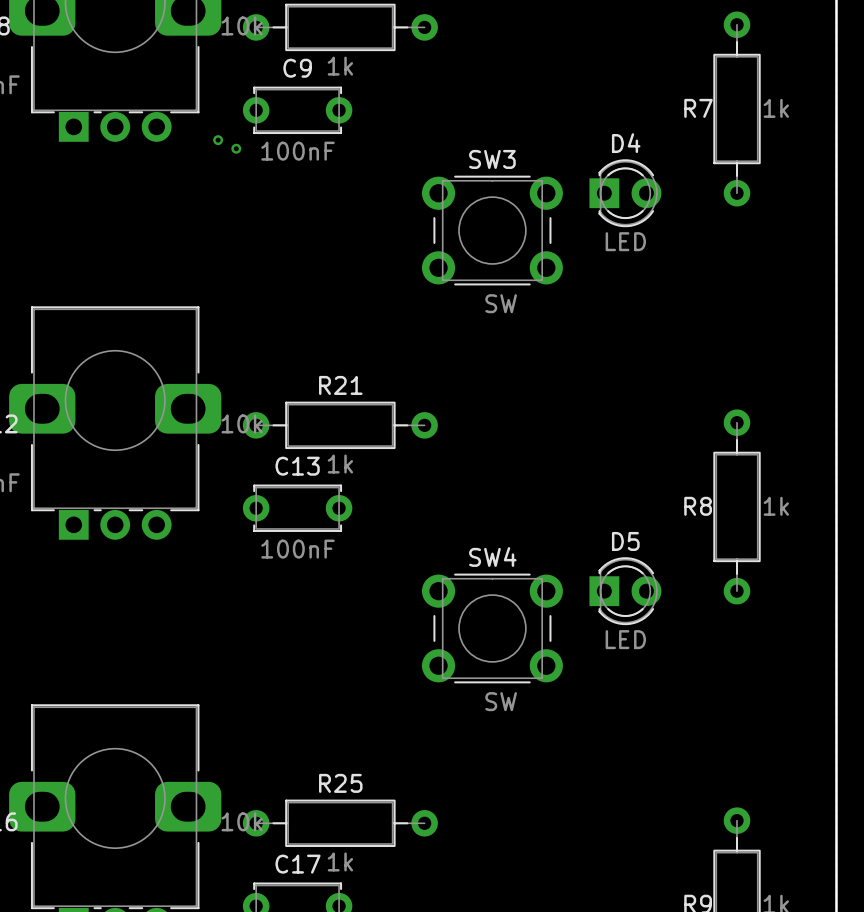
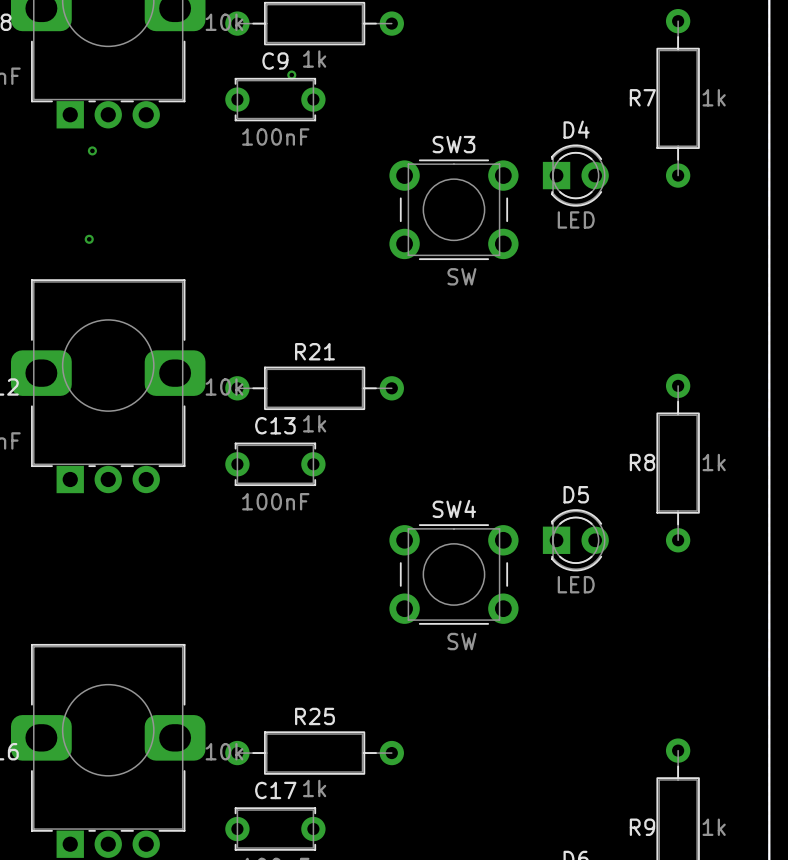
via: none -> (291, 75)
via: (218, 140) -> none
via: (236, 148) -> none
via: none -> (92, 150)
via: none -> (89, 239)

